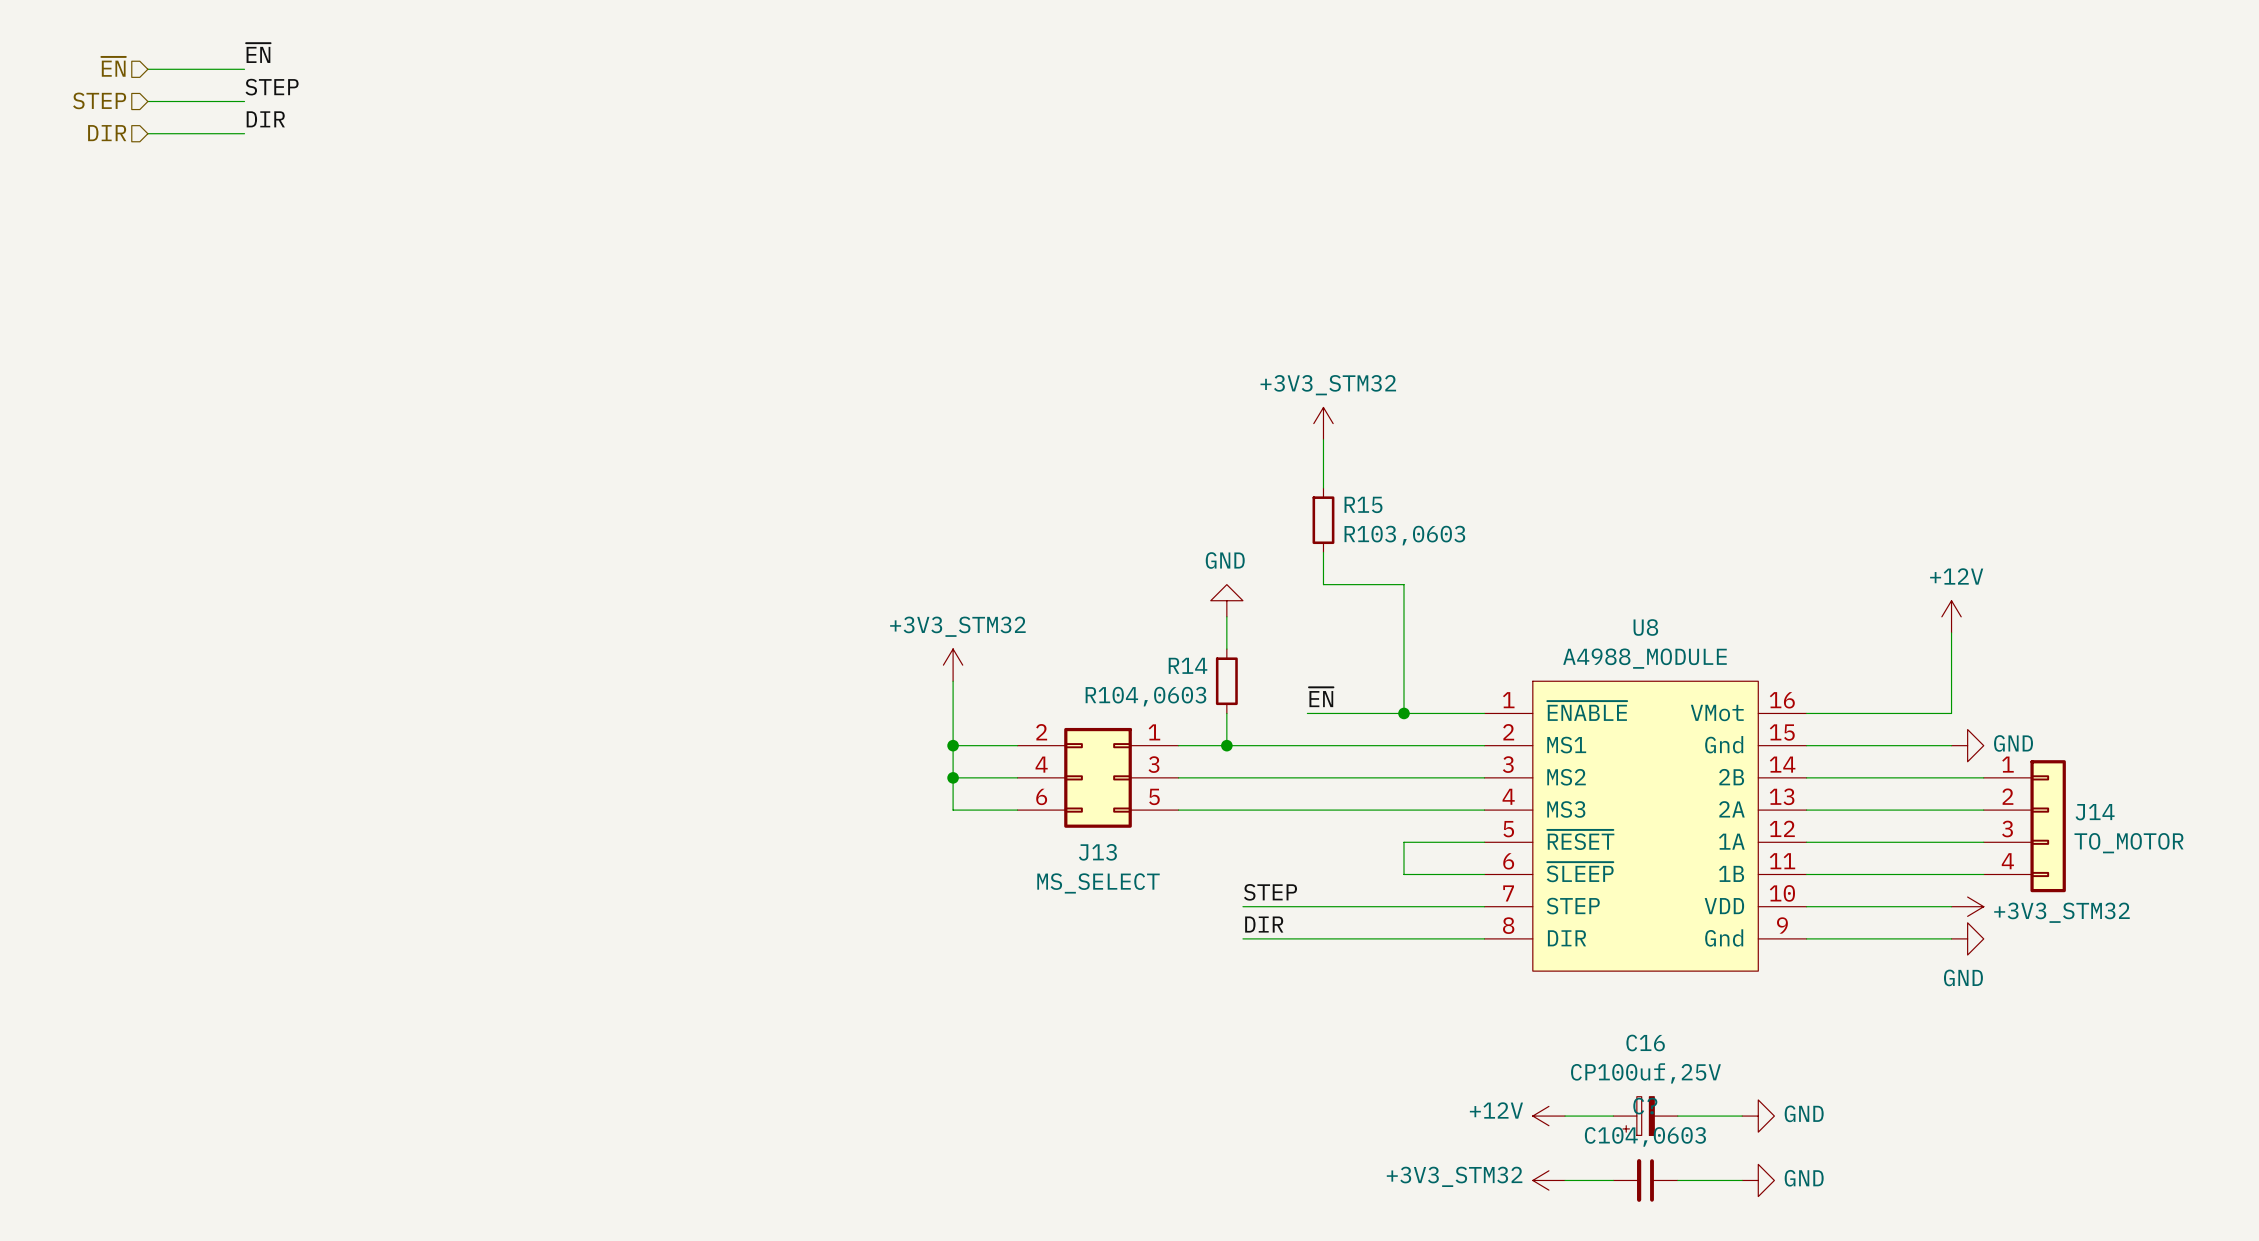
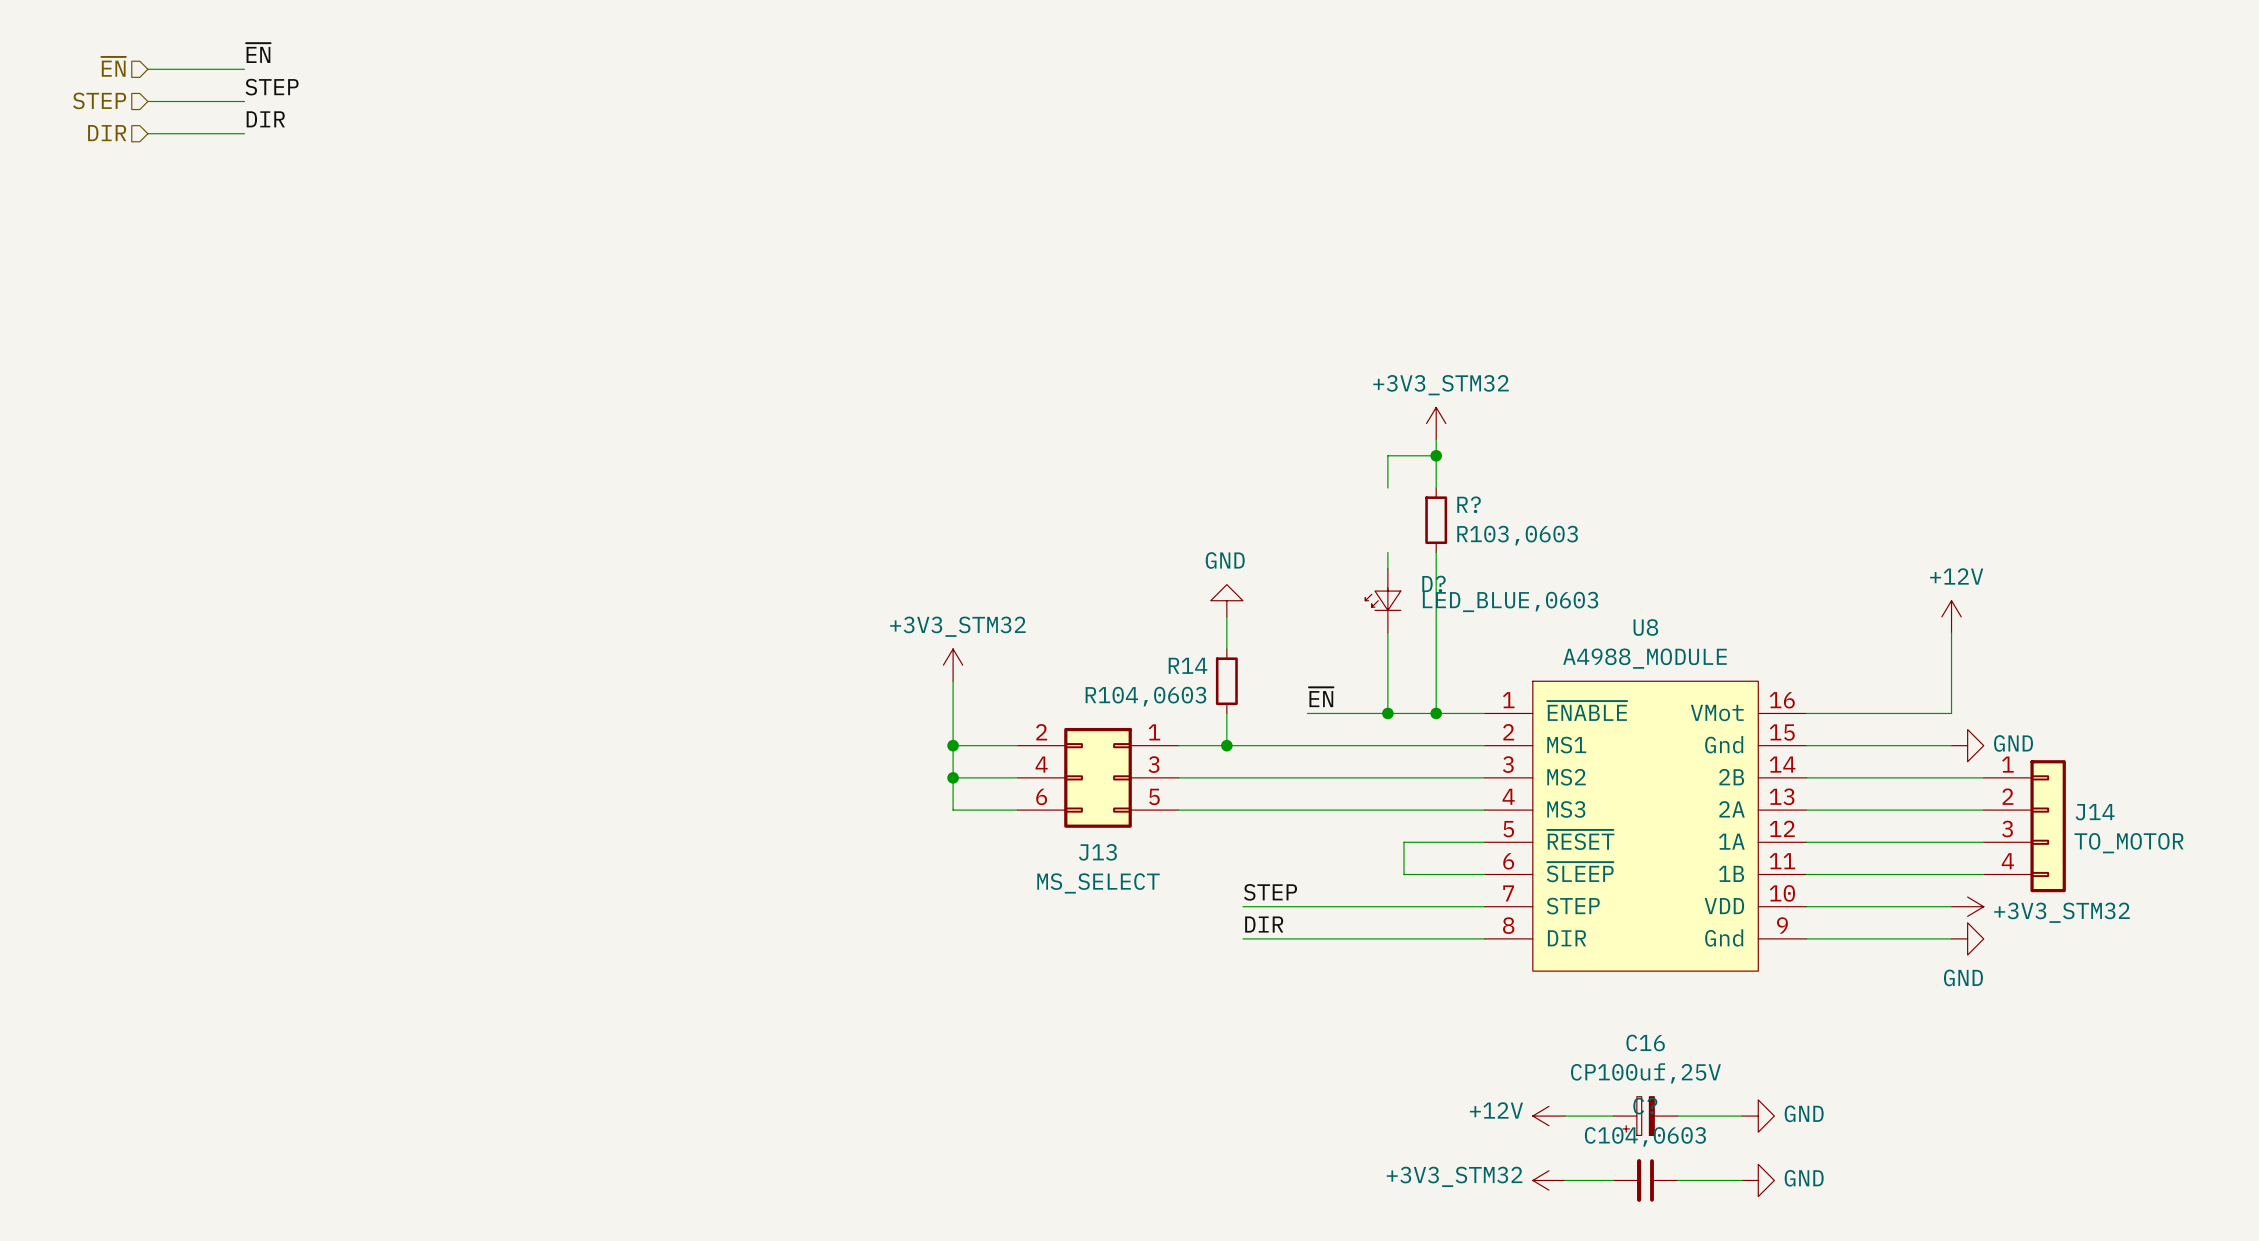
power symbol position: +3V3_STM32 (1323, 423) -> +3V3_STM32 (1436, 423)
wire: (1323, 439) (1323, 488) -> (1436, 439) (1436, 488)
wire: none -> (1436, 455) (1387, 455) (1387, 488)
junction: none -> (1436, 455)
R15: R103,0603 (1323, 520) -> none
R?: none -> R103,0603 (1436, 520)
wire: (1323, 552) (1323, 584) (1403, 584) (1403, 713) -> none
wire: none -> (1387, 552) (1387, 568)
wire: none -> (1436, 552) (1436, 713)
D?: none -> LED_BLUE,0603 (1383, 600)
wire: none -> (1387, 632) (1387, 713)
junction: none -> (1387, 713)
junction: (1403, 713) -> none
junction: none -> (1436, 713)

